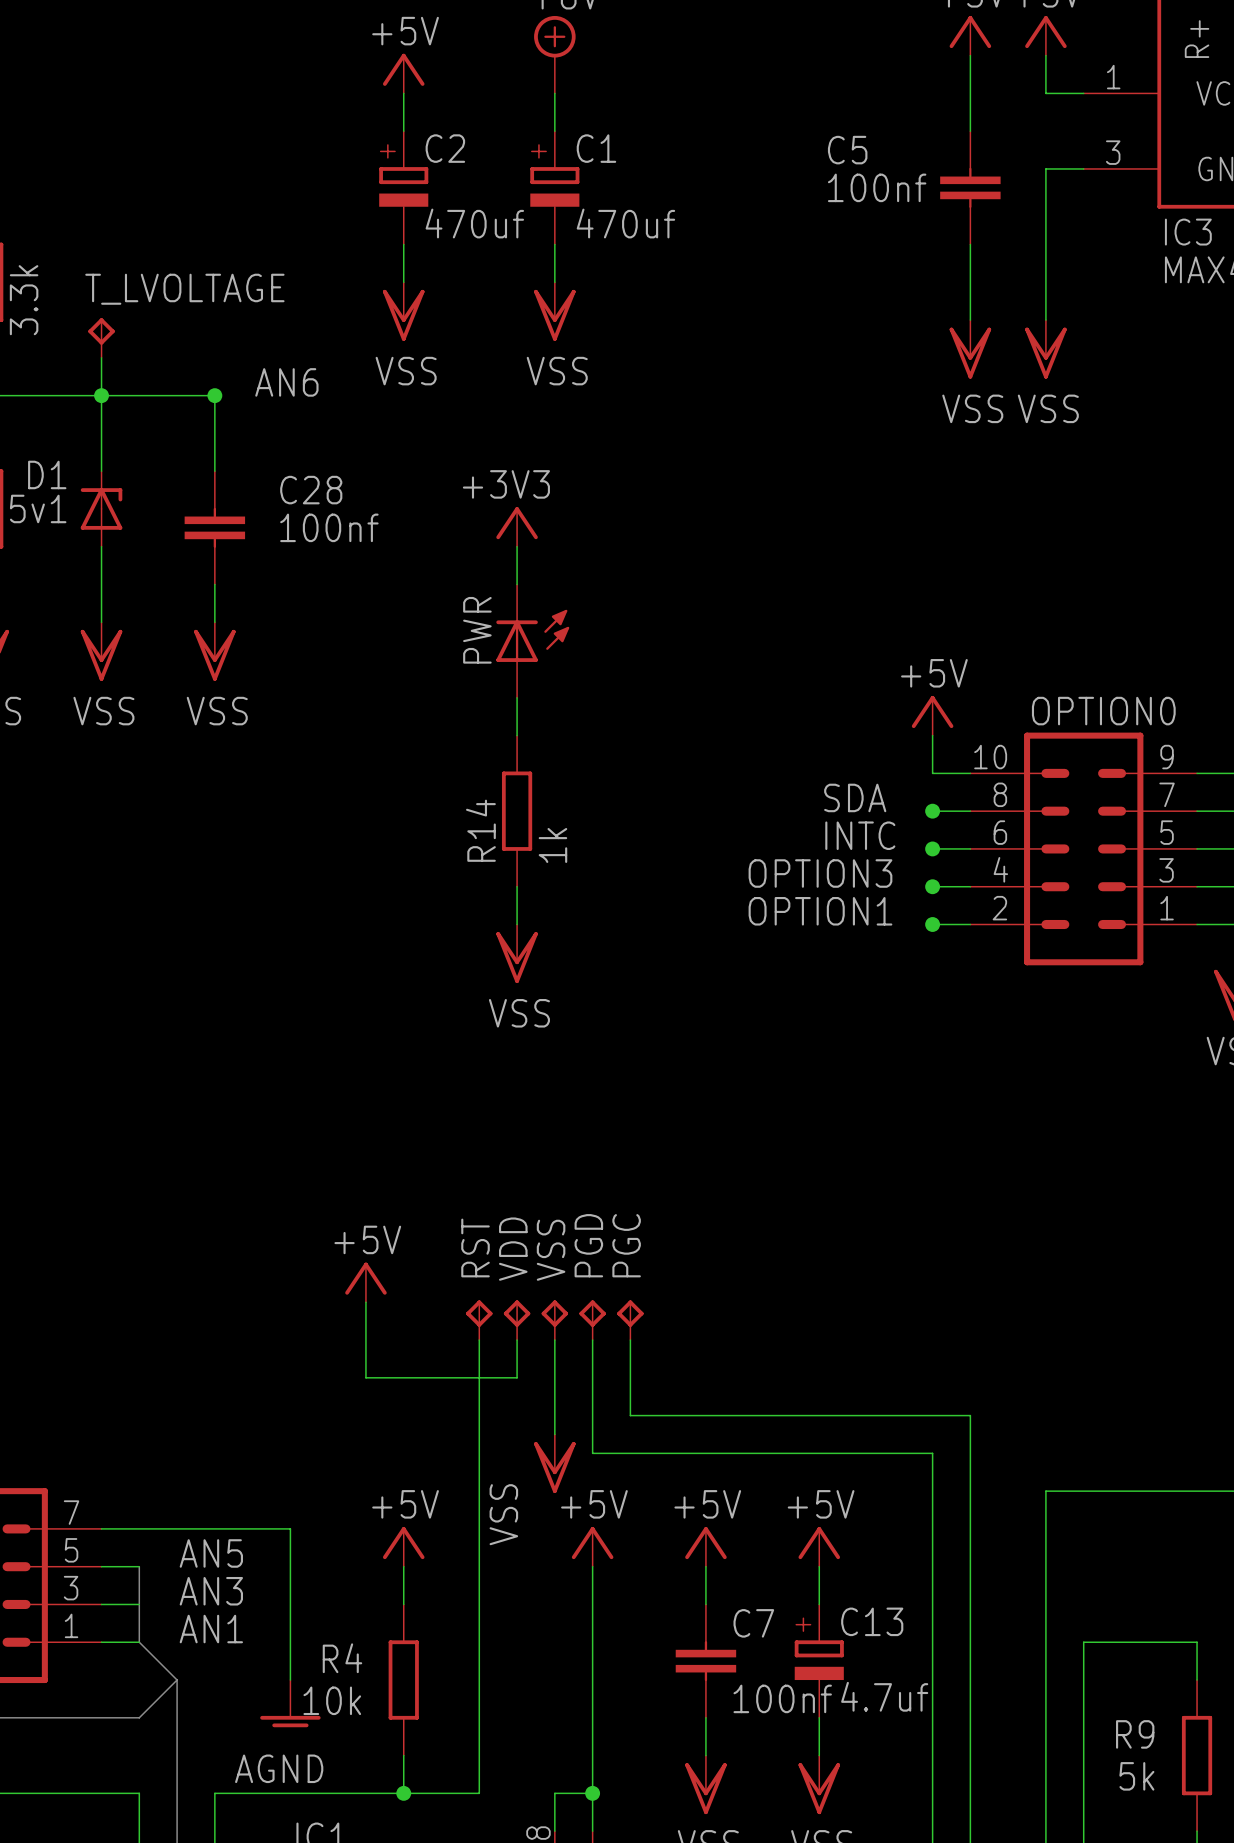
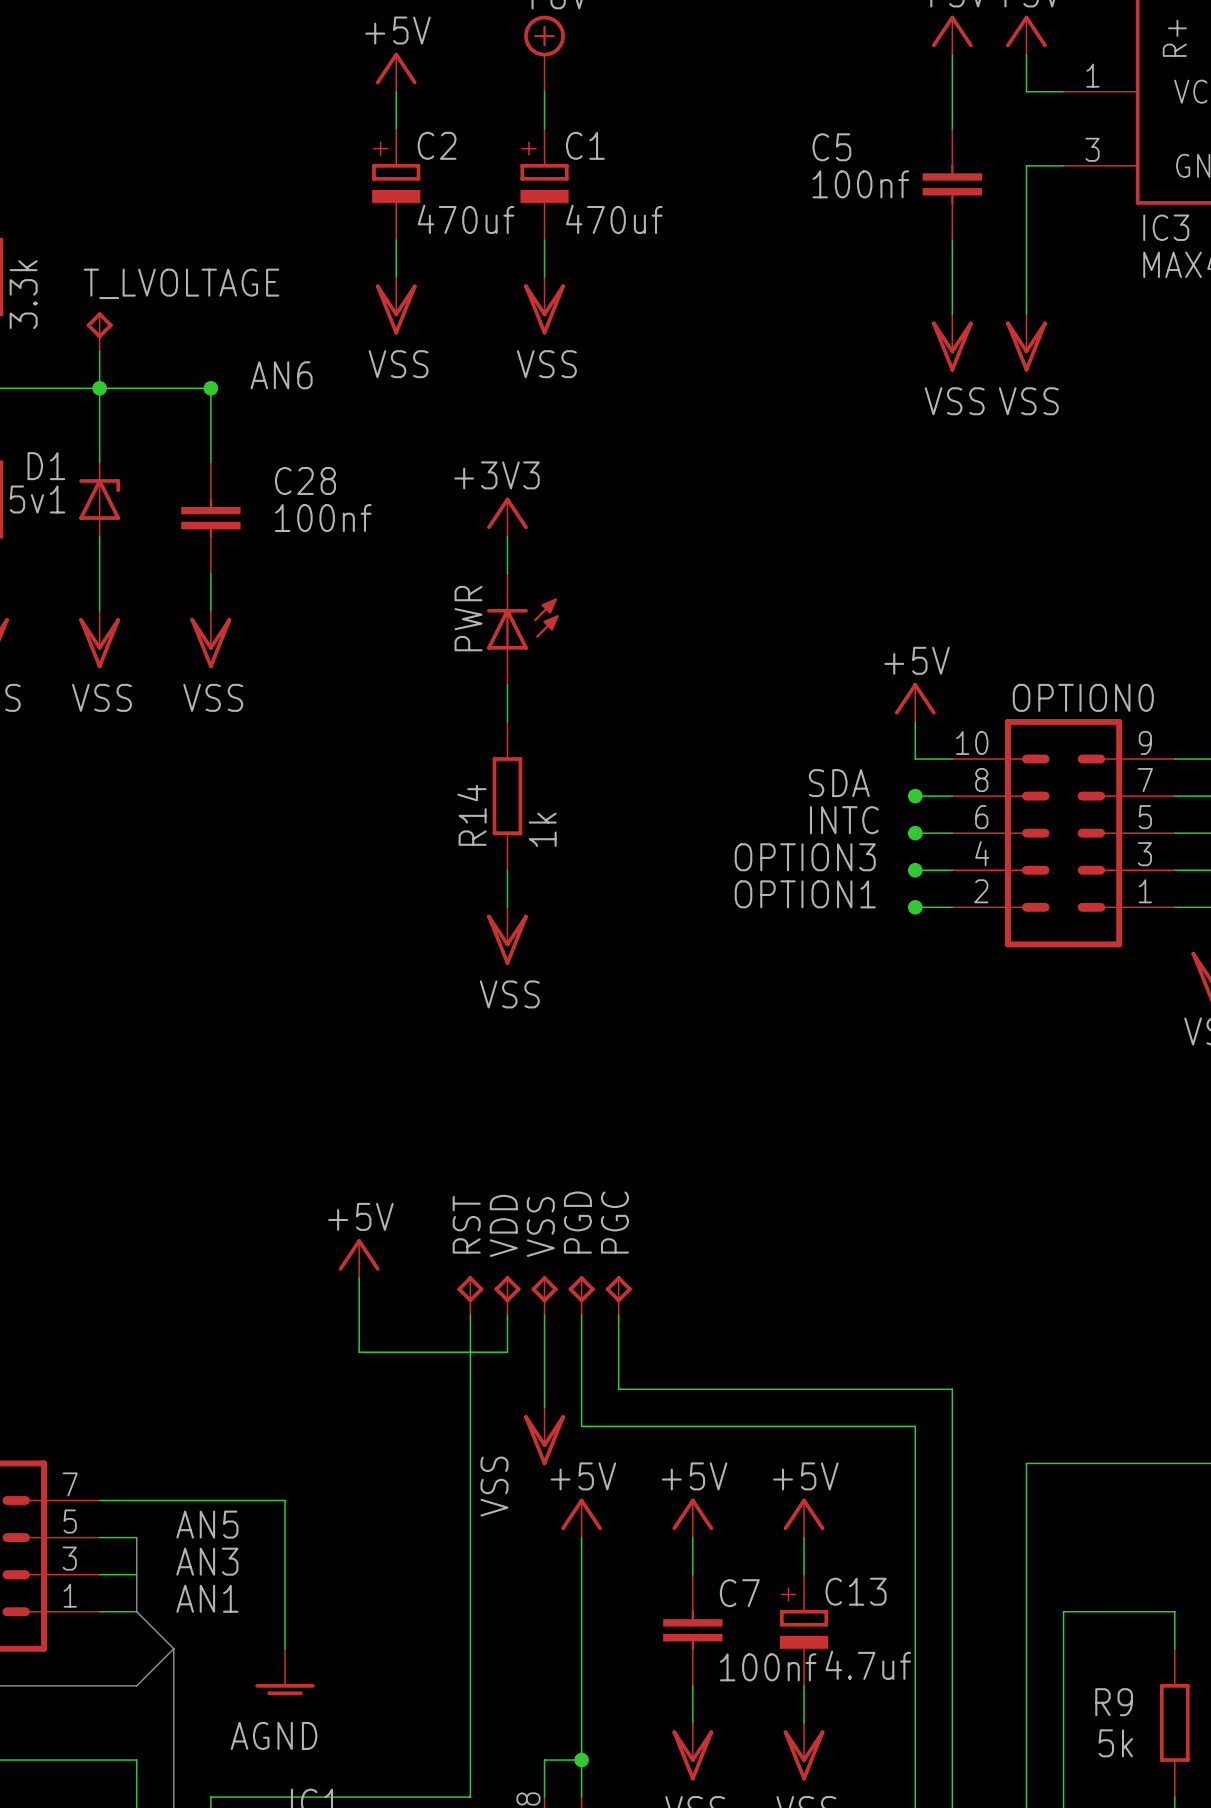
power symbol: +5V (403, 1546) -> none
wire: (403, 1566) (403, 1604) -> none
R4: 10k (403, 1680) -> none
wire: (403, 1755) (403, 1793) -> none
junction: (403, 1793) -> none
wire: (479, 1793) (214, 1793) (214, 1831) -> (470, 1760) (470, 1797) (210, 1797)

